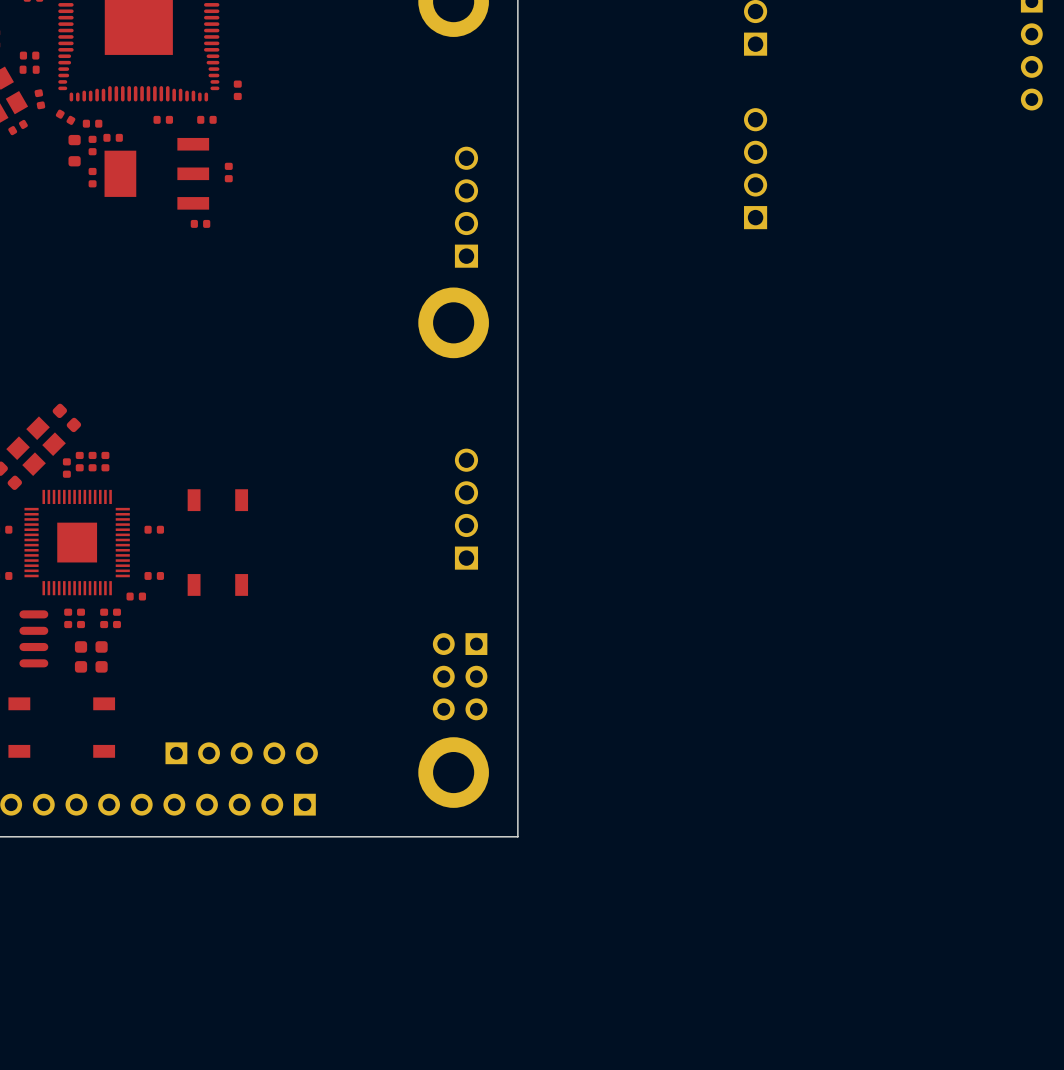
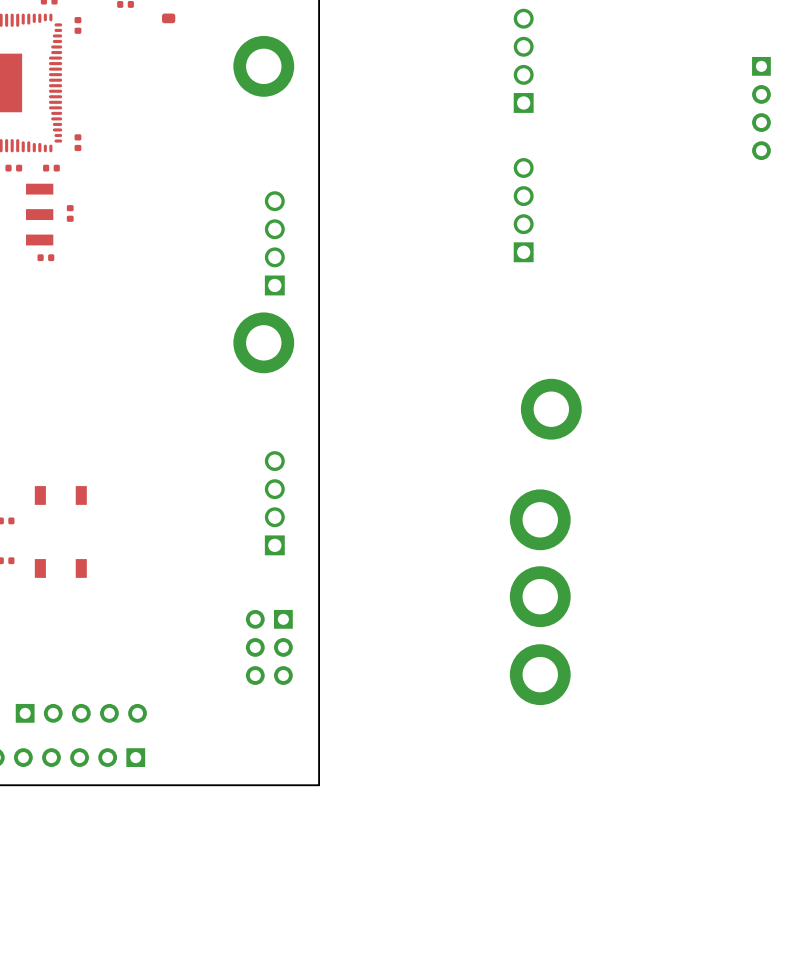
part: none -> (551, 409)
part: none -> (540, 519)
part: none -> (540, 596)
part: none -> (540, 674)
part: (453, 772) -> none

